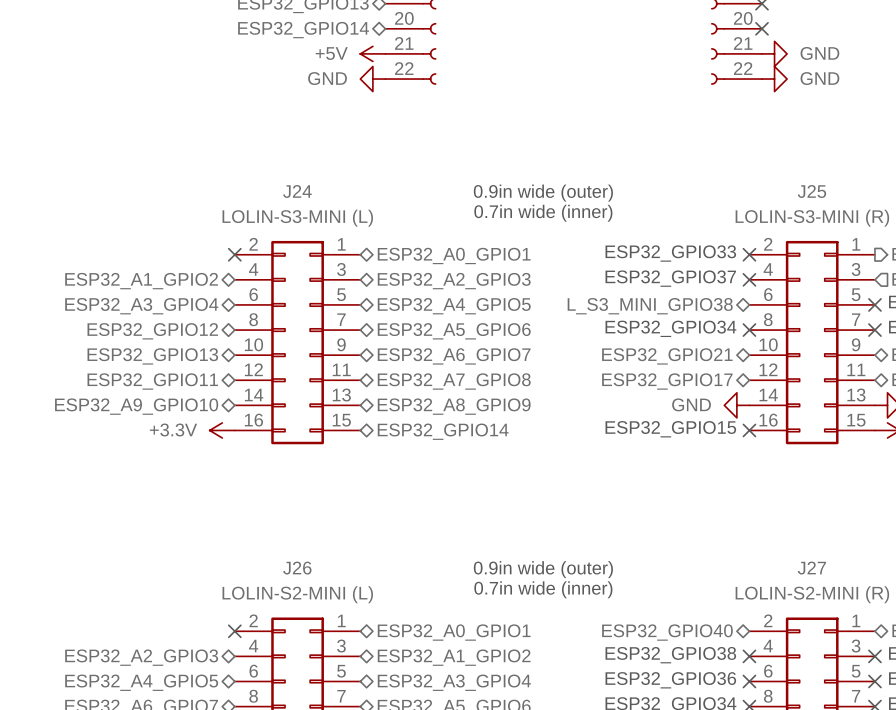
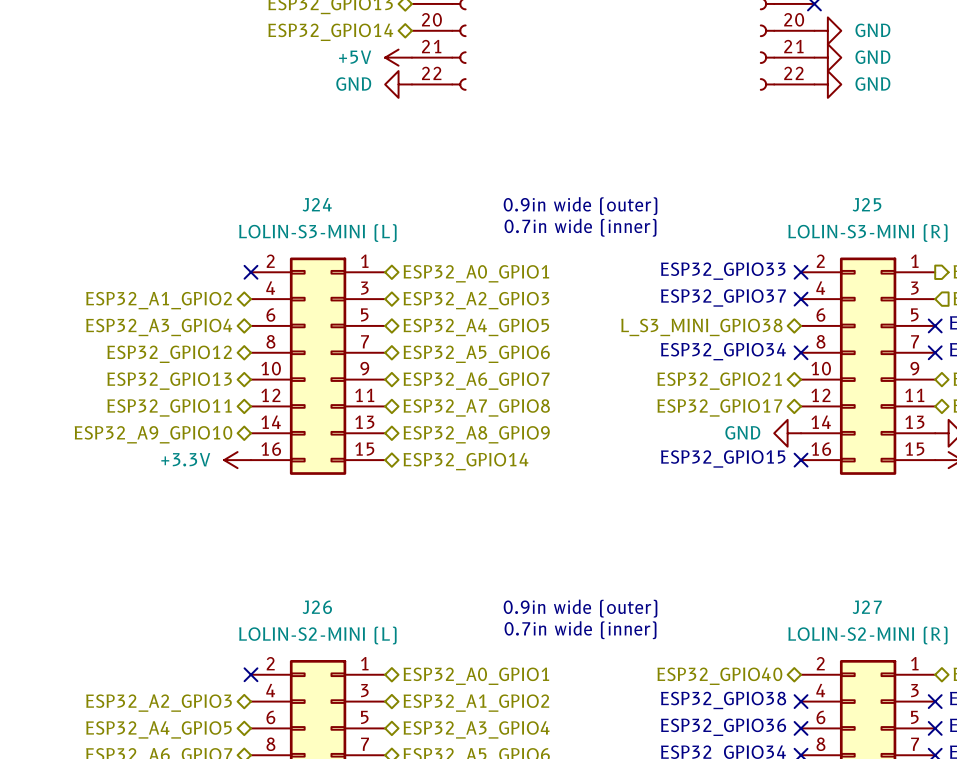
no-connect mark: (761, 28) -> none
power symbol: none -> GND (827, 30)

